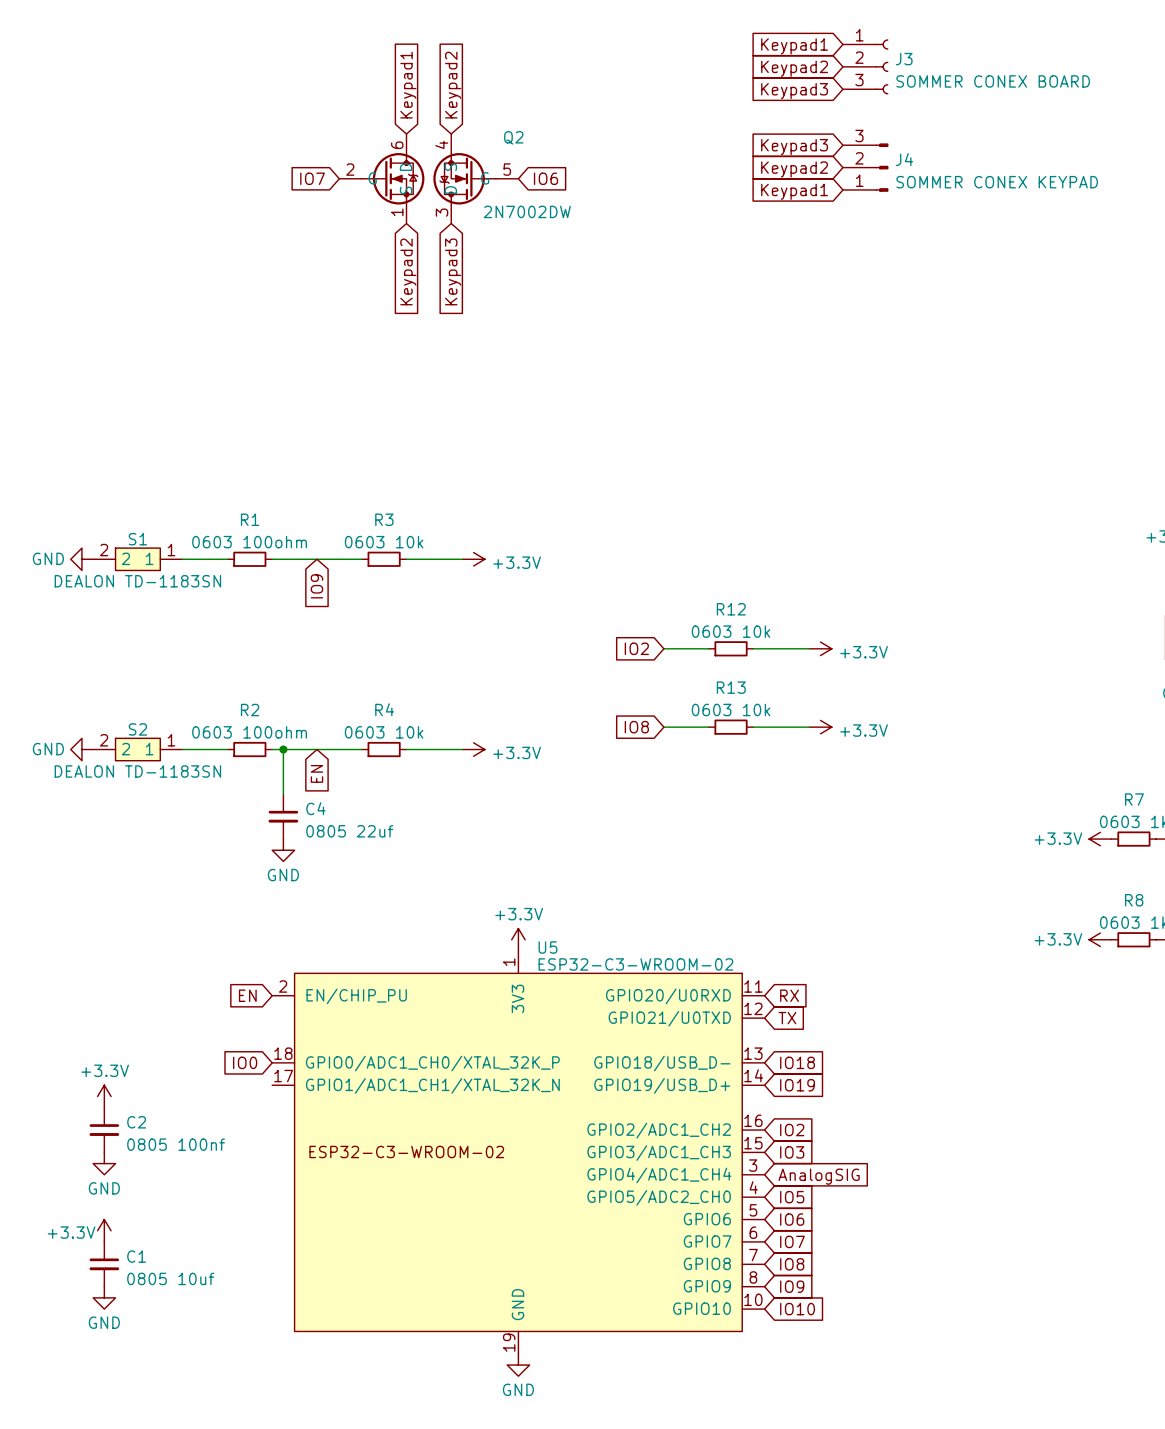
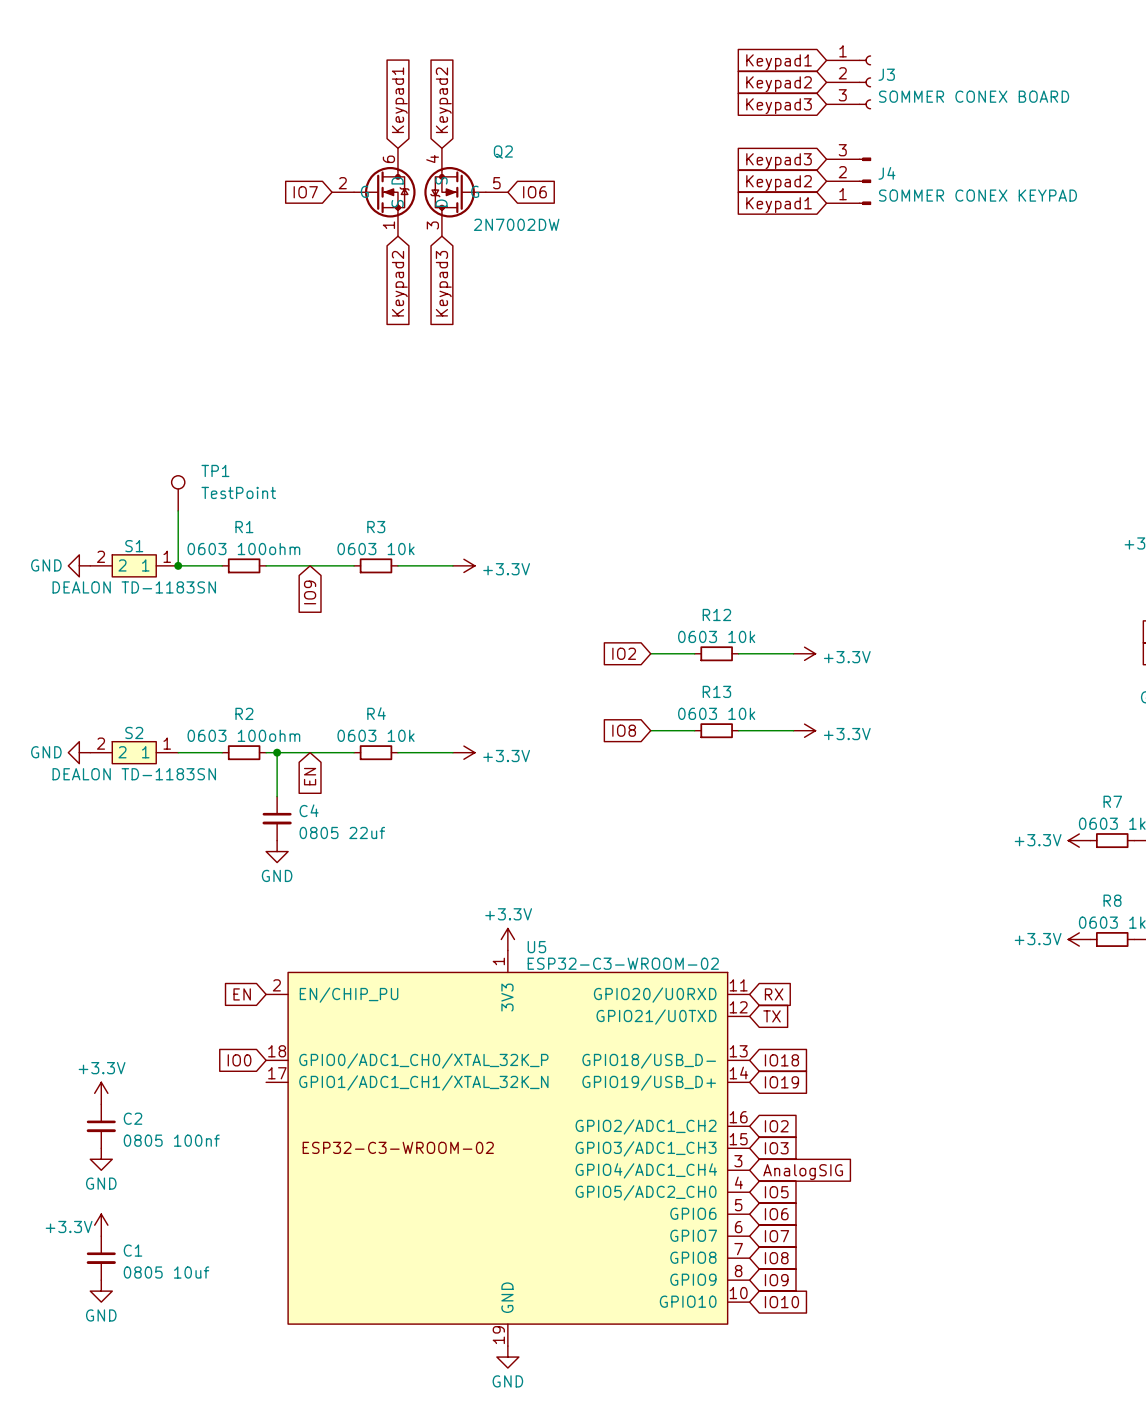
TP1: none -> TestPoint (178, 493)
wire: none -> (178, 510) (178, 565)
junction: none -> (178, 565)

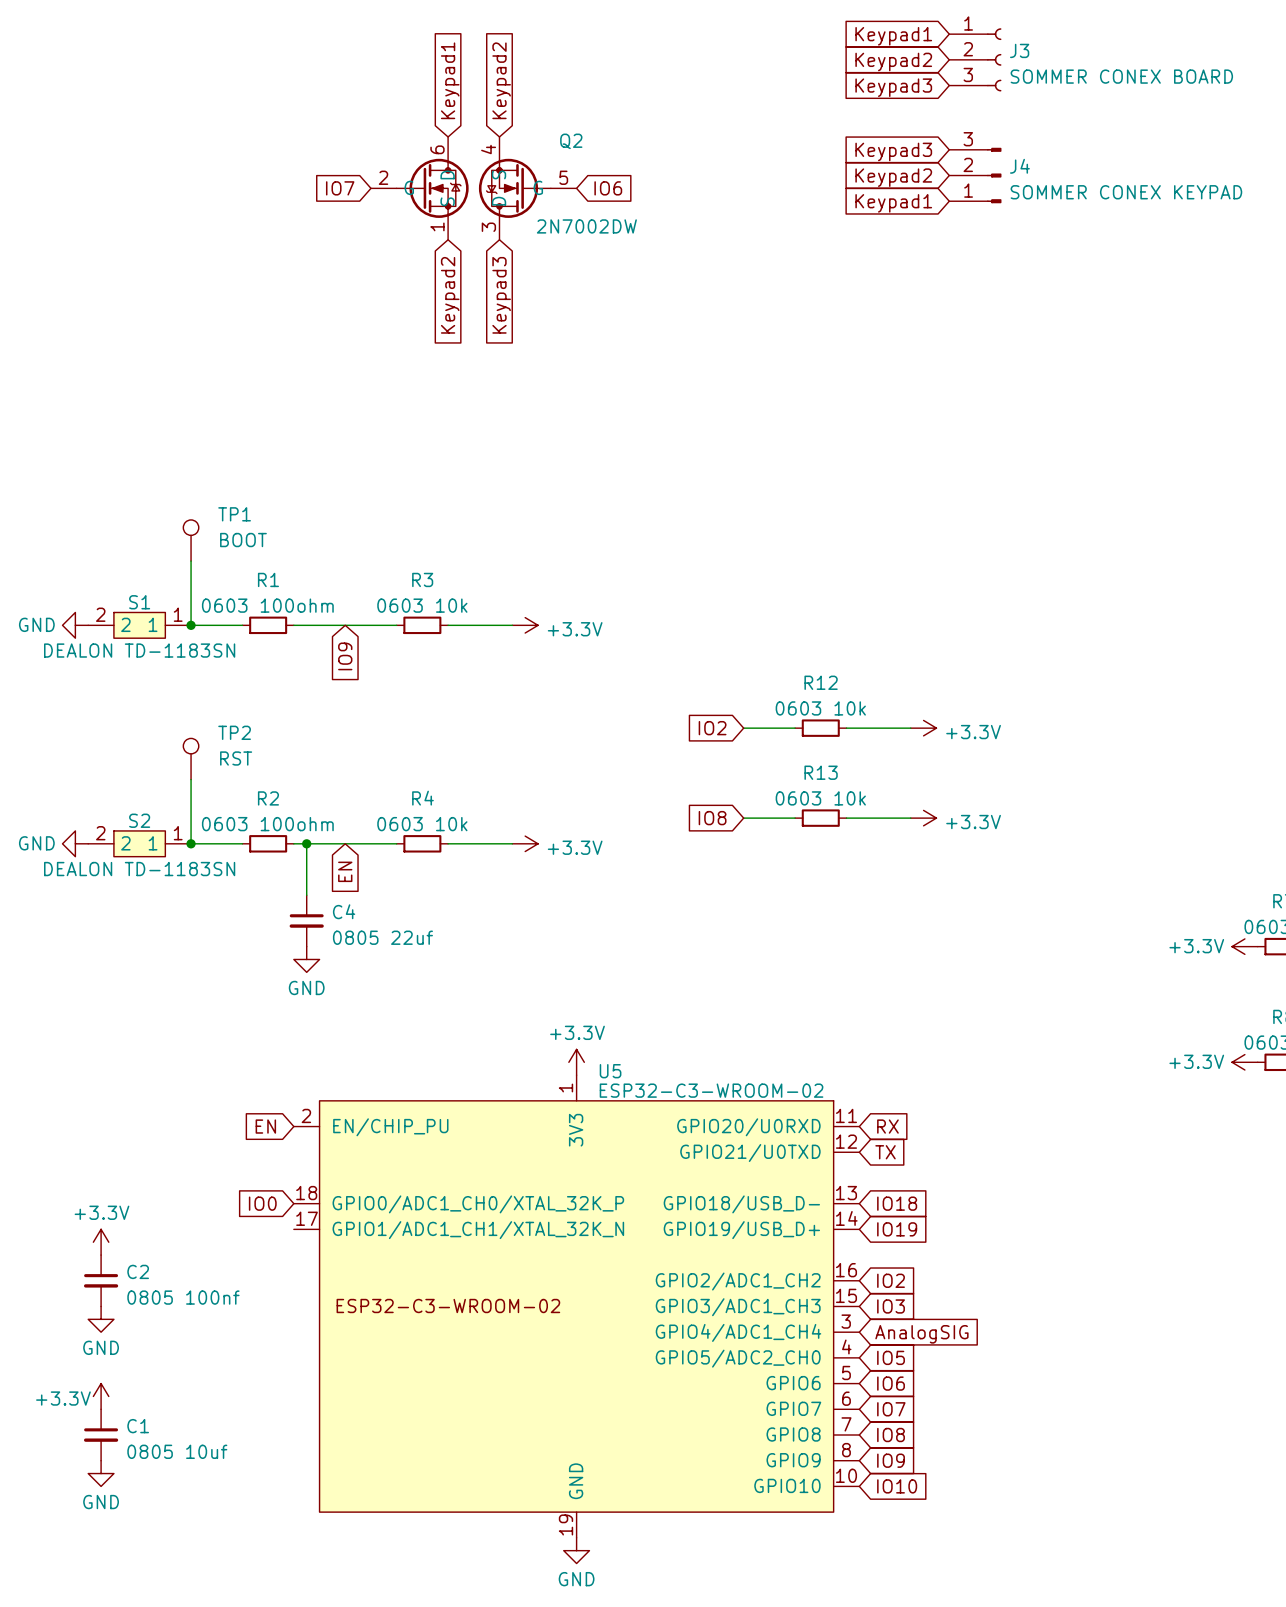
TP1 value: TestPoint (238, 492) -> BOOT (243, 540)
TP2: none -> RST (191, 758)
wire: none -> (191, 779) (191, 843)
junction: none -> (191, 843)

